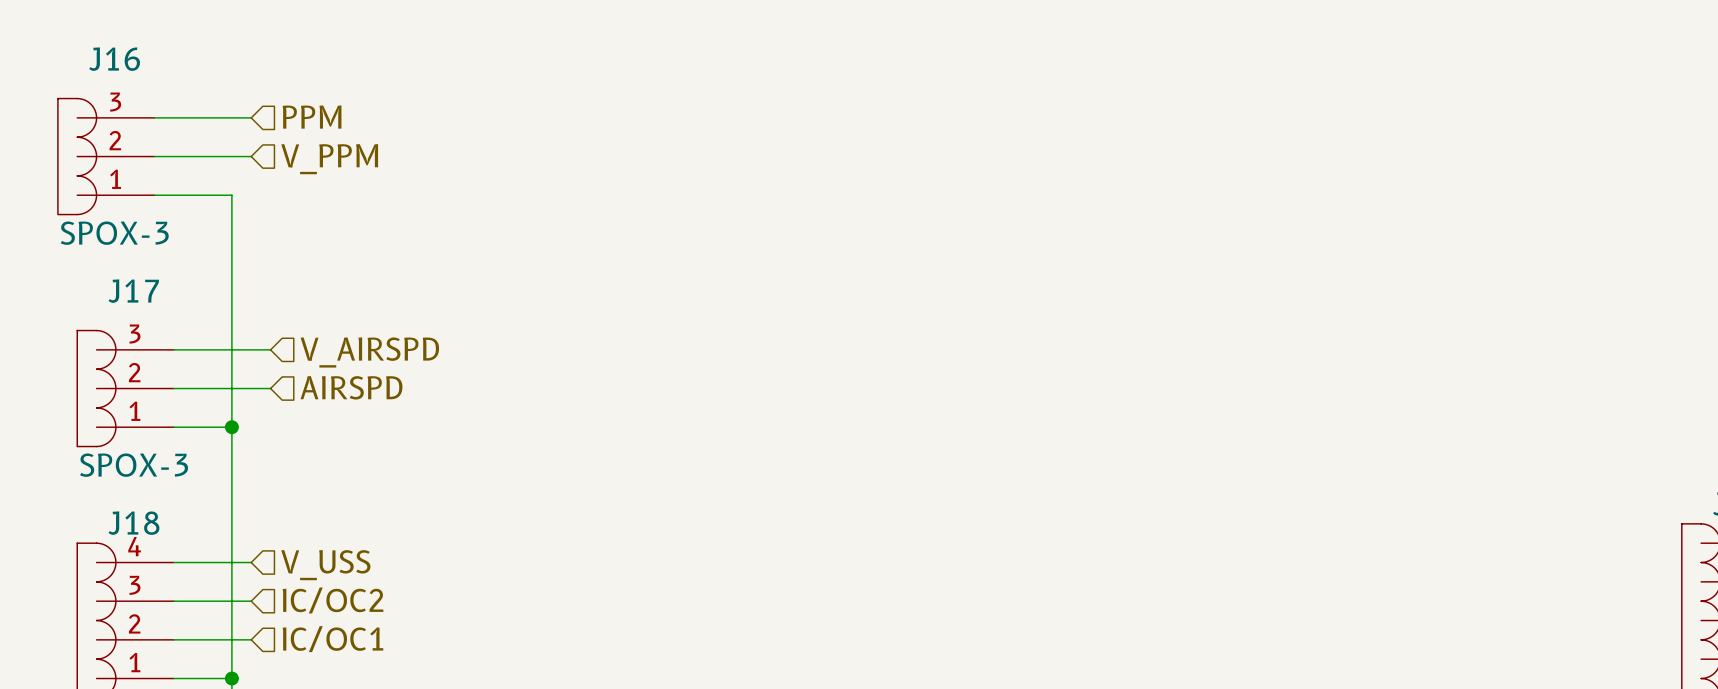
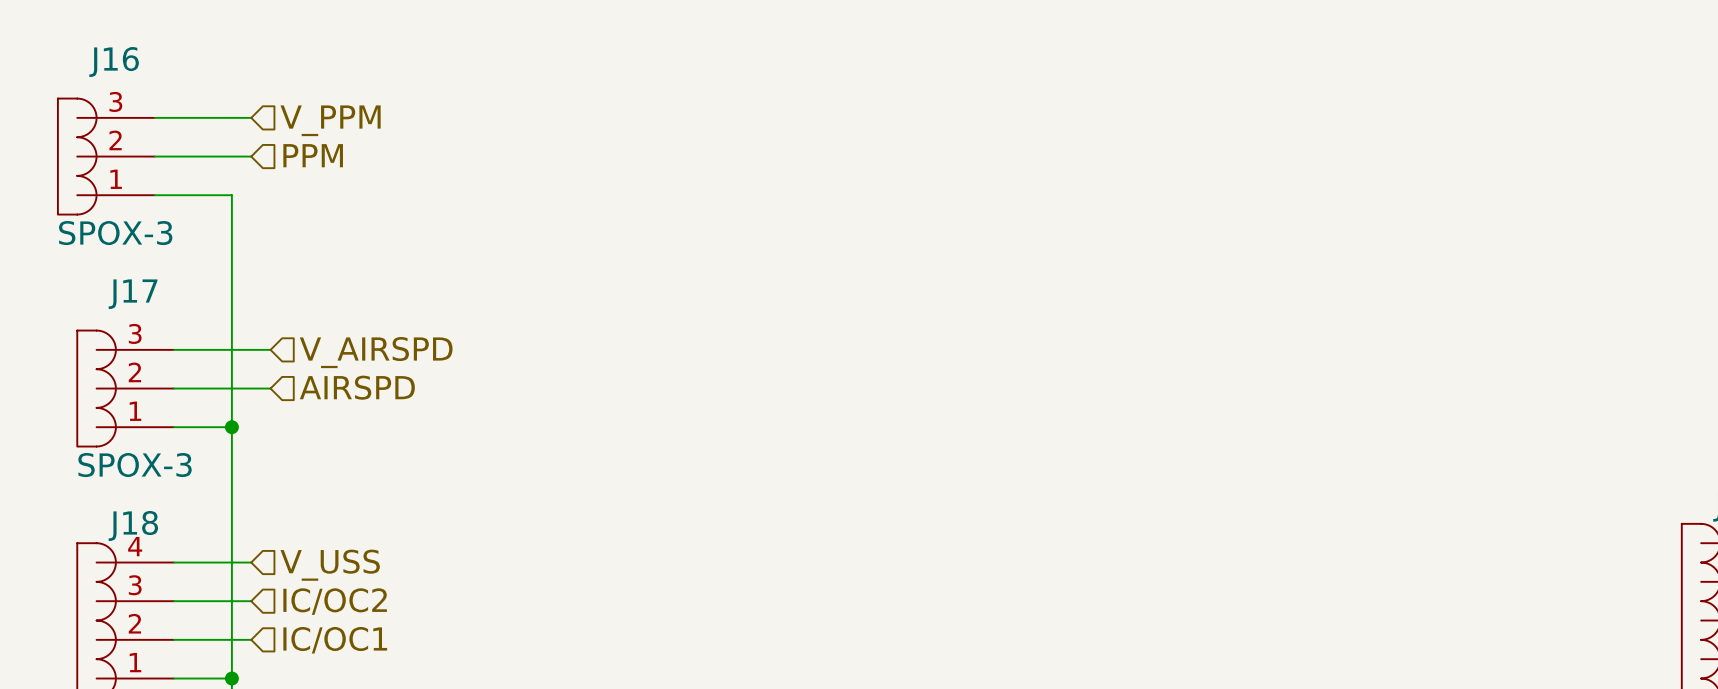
hierarchical label: PPM (312, 117) -> V_PPM (330, 120)
hierarchical label: V_PPM (329, 159) -> PPM (313, 155)

